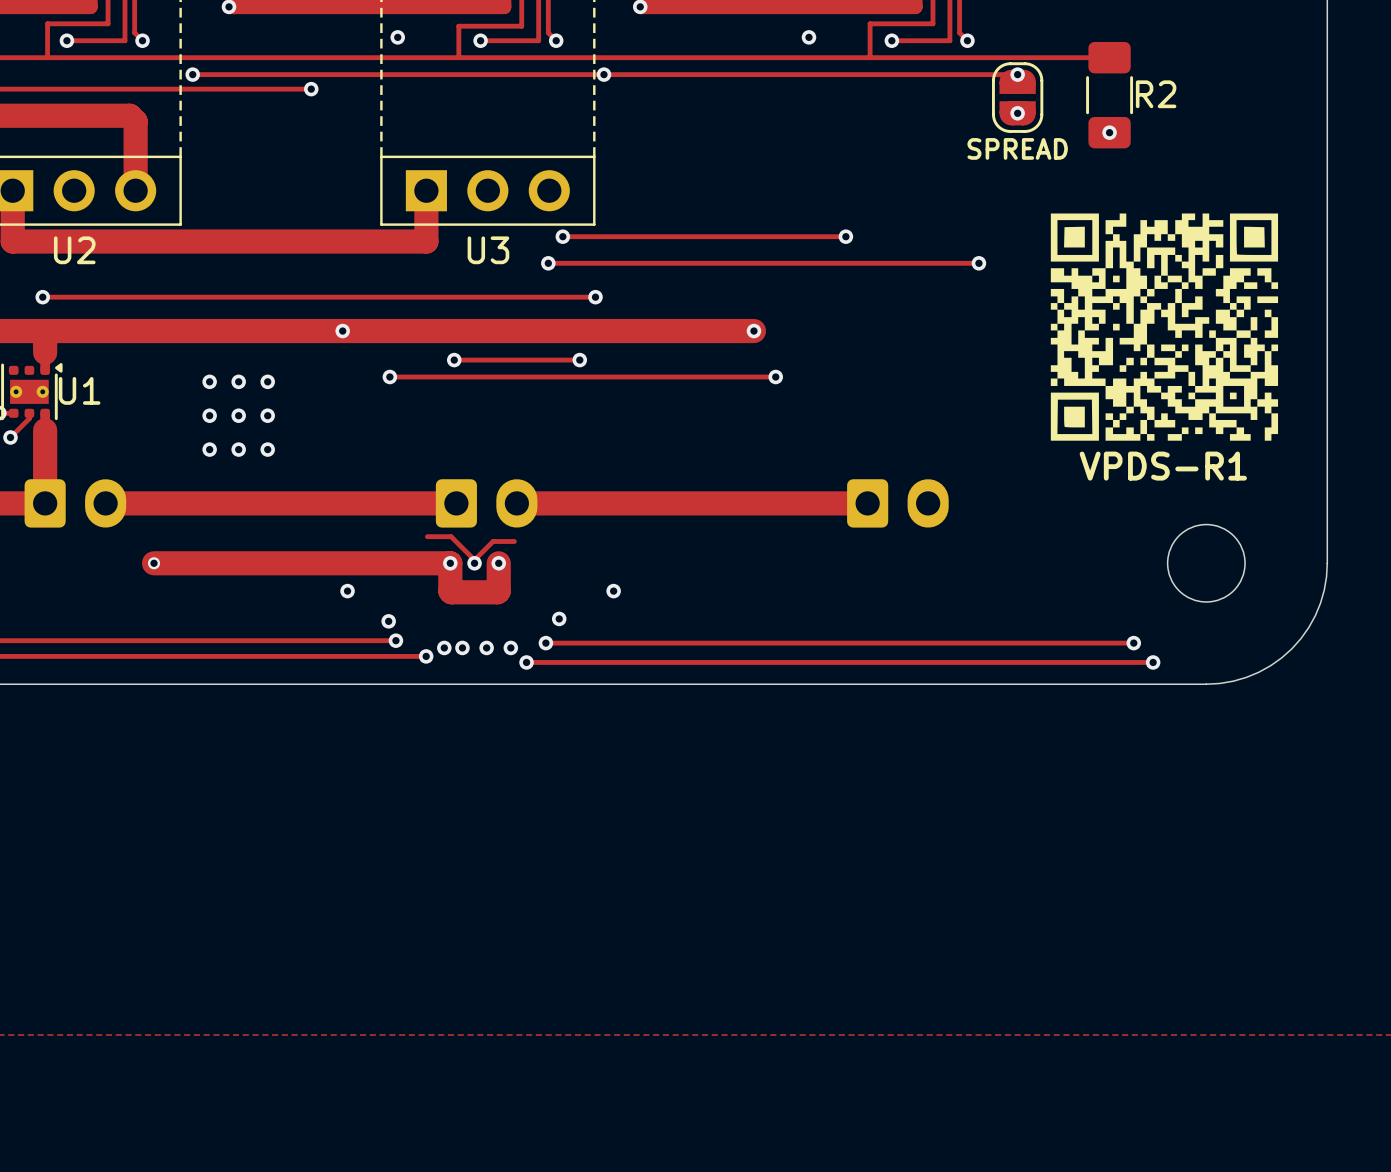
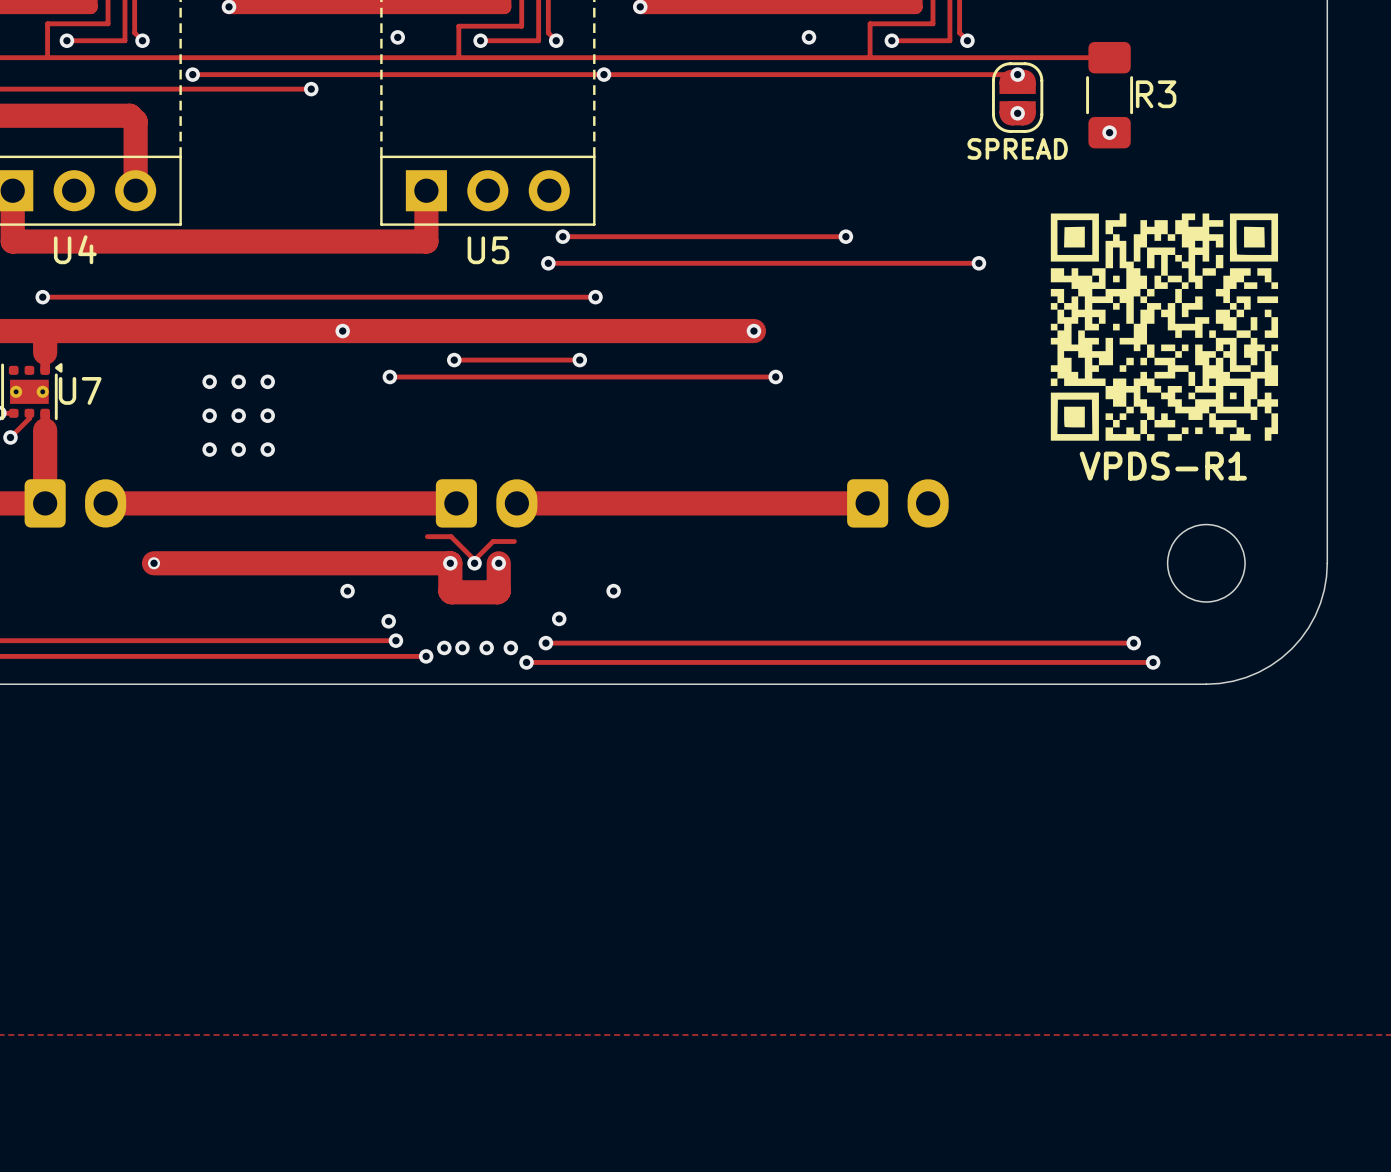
R2 name: R2 (1156, 94) -> R3 (1156, 94)
U2 name: U2 (74, 250) -> U4 (75, 249)
U3 name: U3 (488, 250) -> U5 (488, 250)
U1 name: U1 (79, 390) -> U7 (80, 390)

